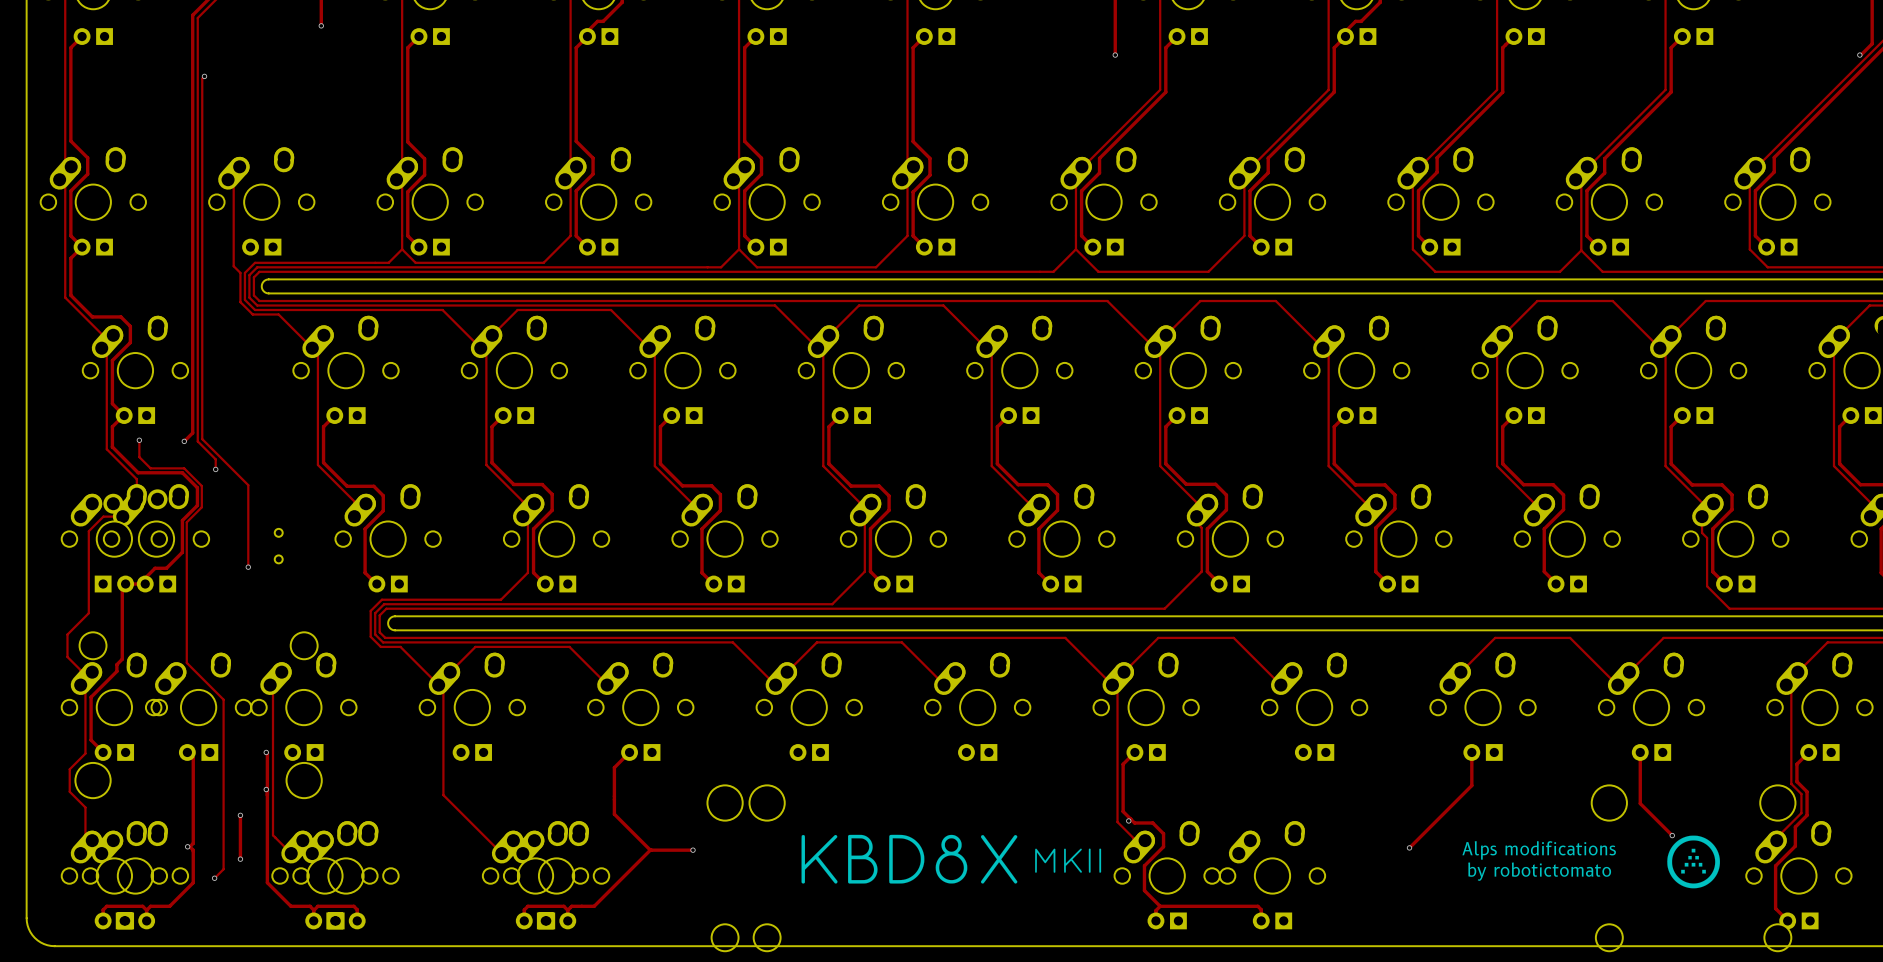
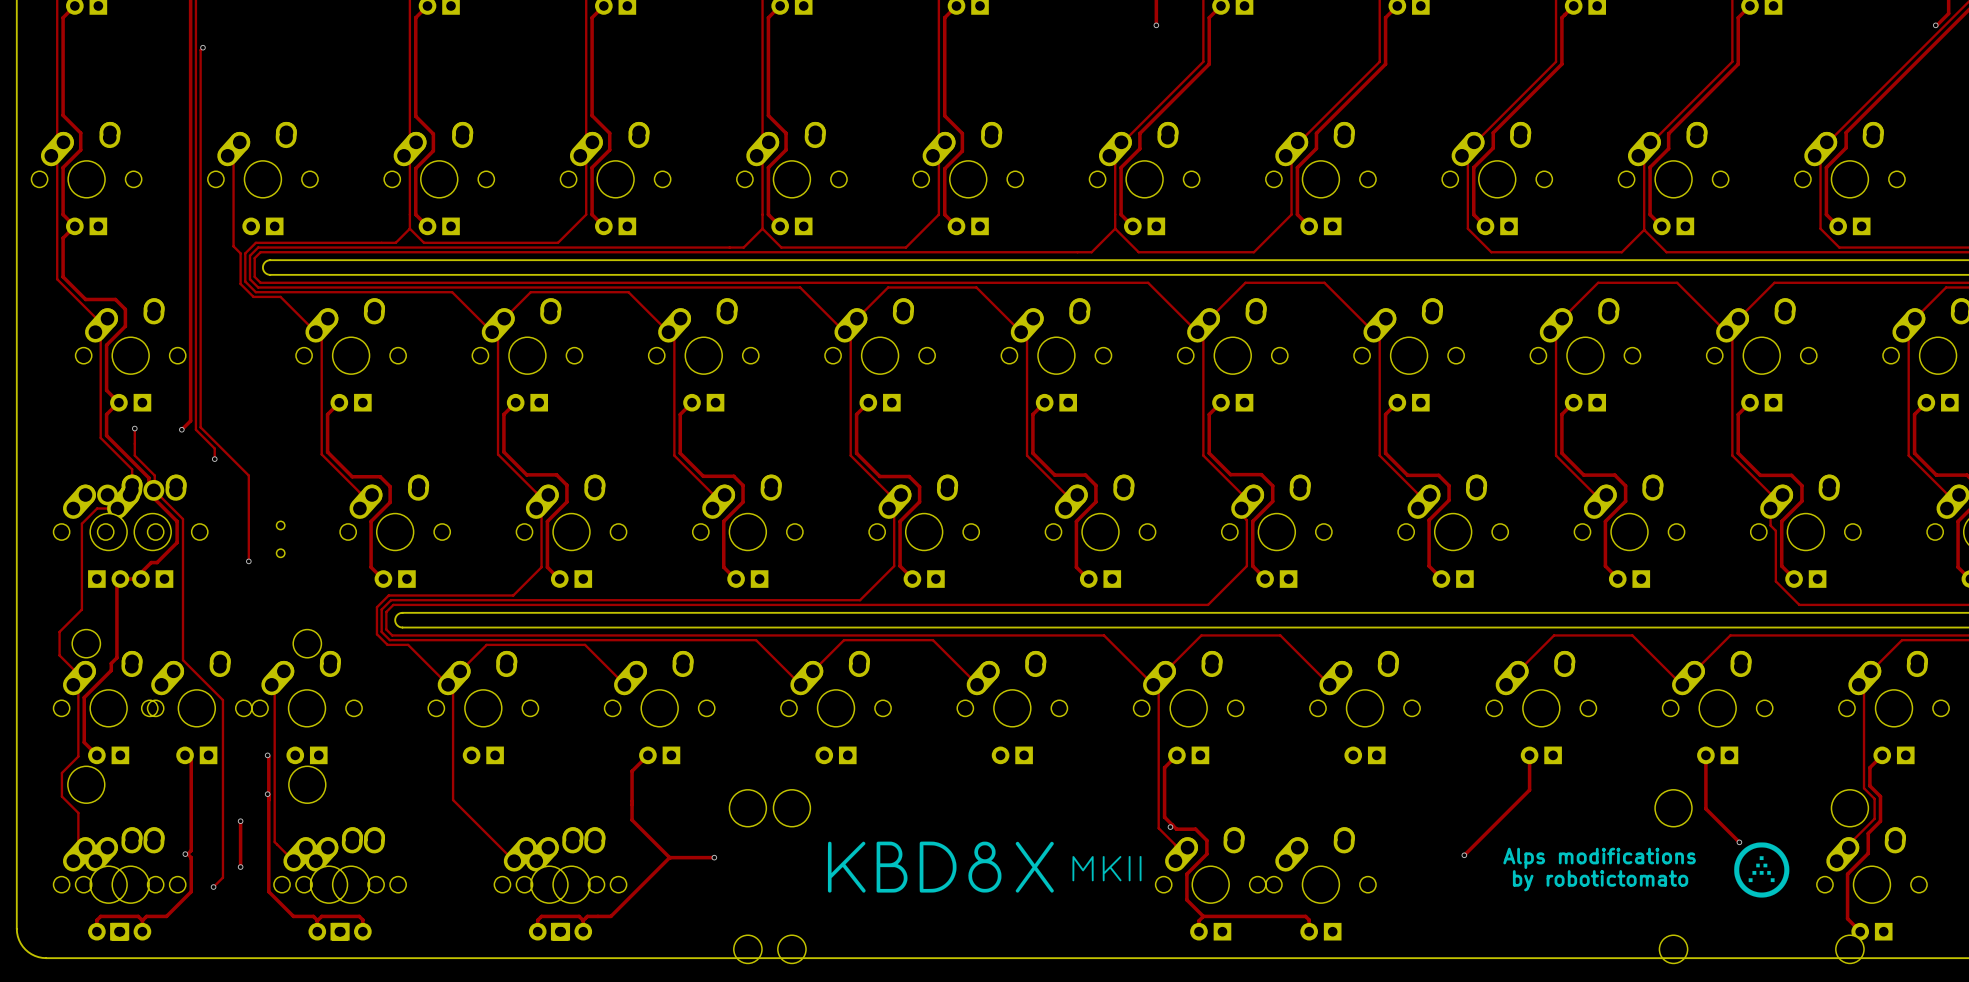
track: (112, 447) (138, 472) (182, 472) (197, 487) (197, 505) (182, 520) (182, 552) (166, 568) (160, 568) -> (106, 435) (148, 477) (148, 493) (177, 521) (177, 542) (157, 562)
track: (139, 457) (150, 468) (184, 468) (201, 485) (201, 507) (186, 522) (186, 662) -> (134, 446) (134, 455) (154, 475) (154, 490) (182, 519) (184, 661)

